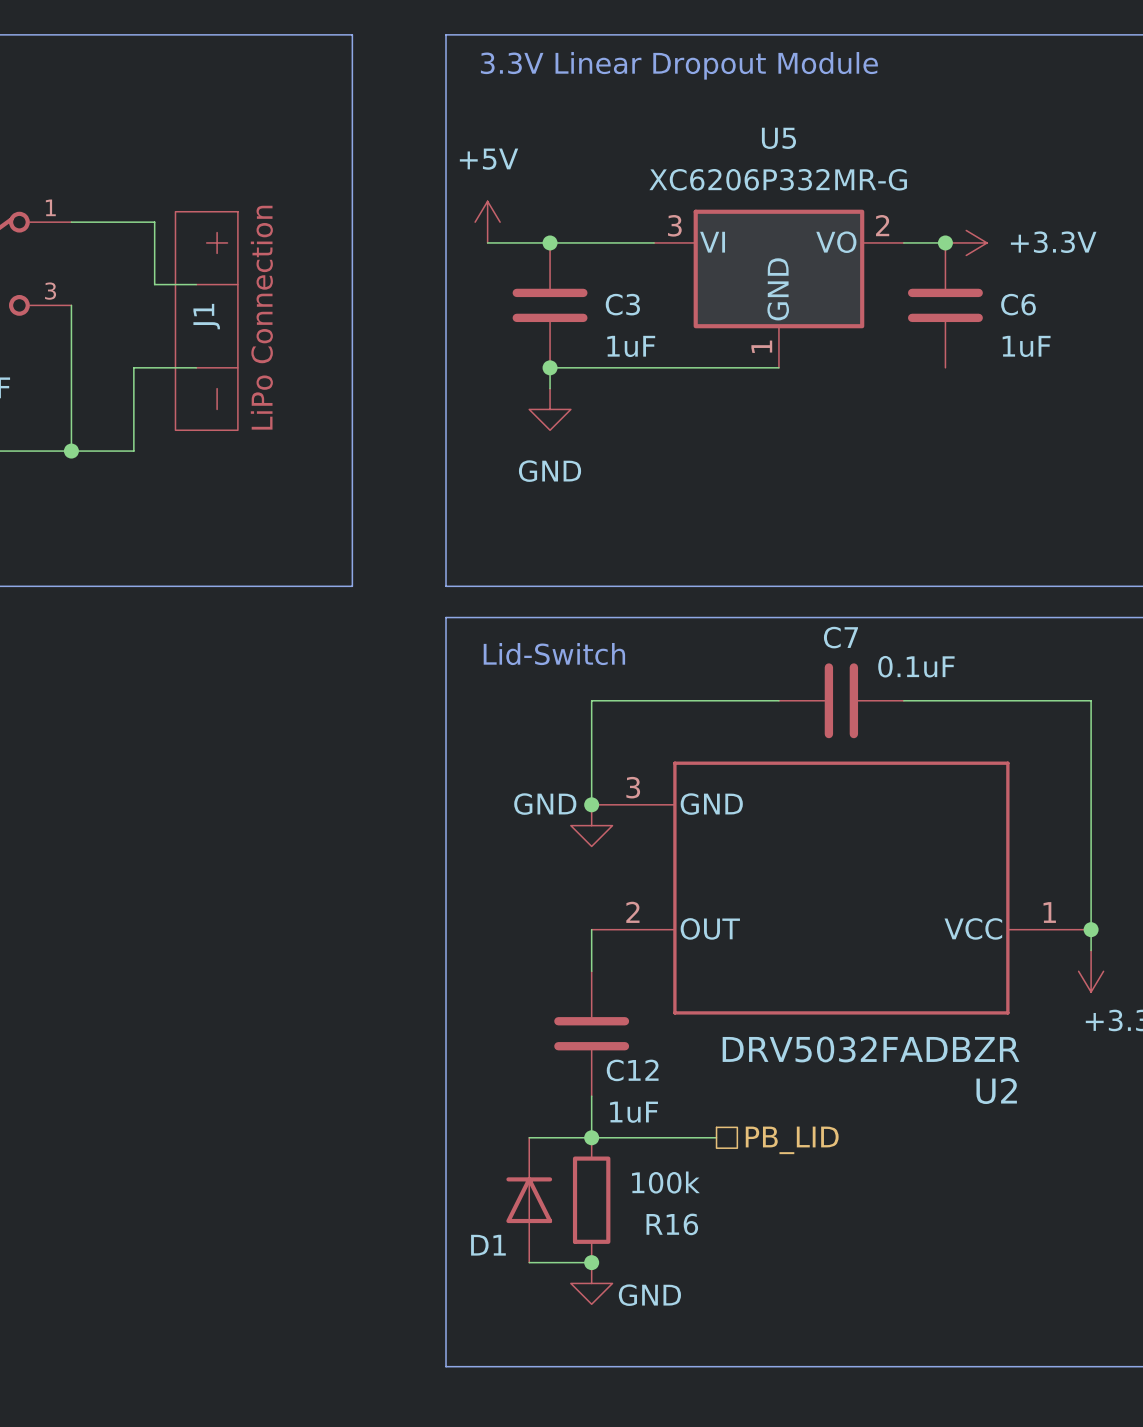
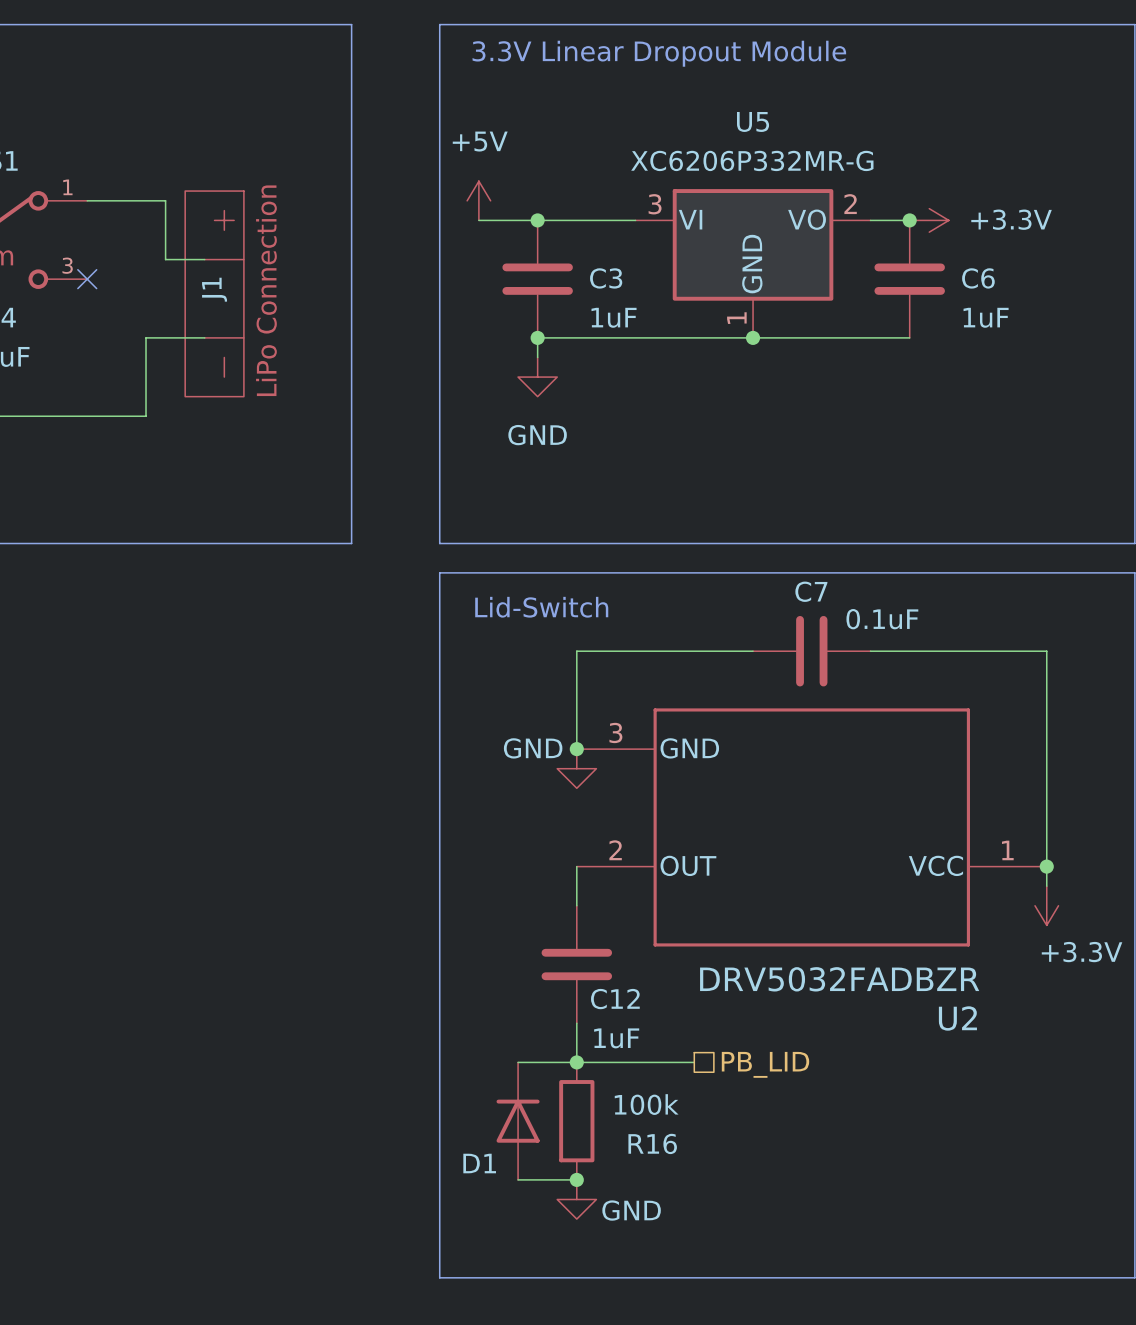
wire: (71, 305) (71, 451) -> none
no-connect mark: none -> (87, 279)
wire: none -> (753, 337) (909, 337)
junction: none -> (753, 337)
junction: (71, 451) -> none

